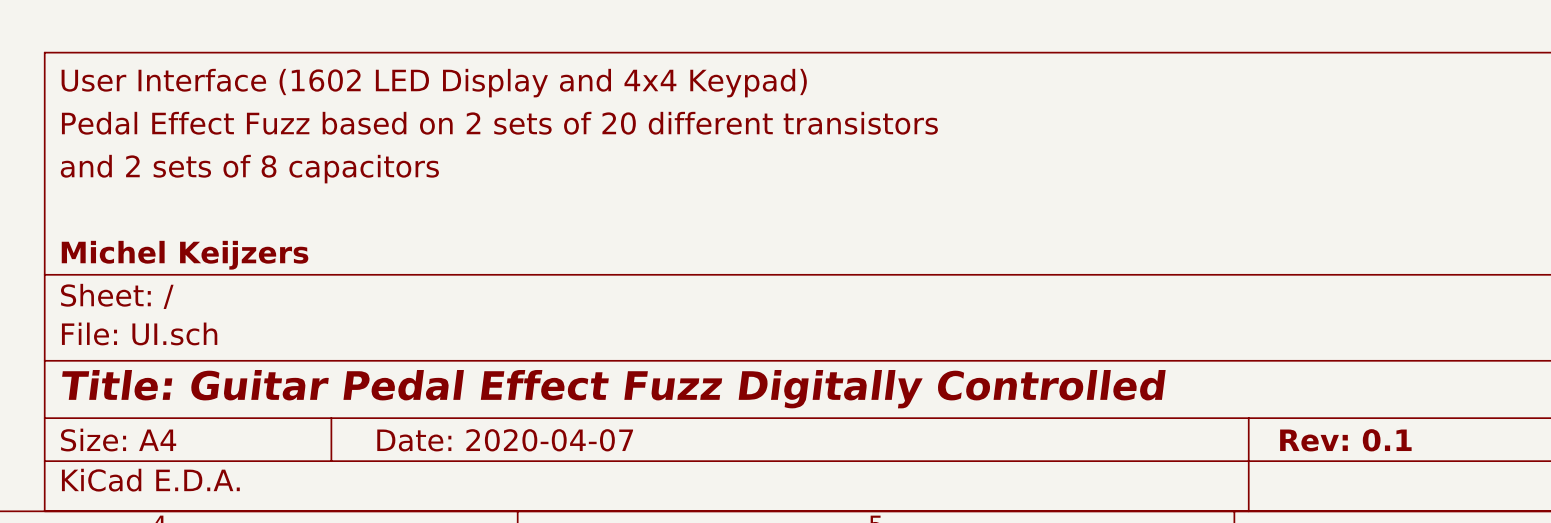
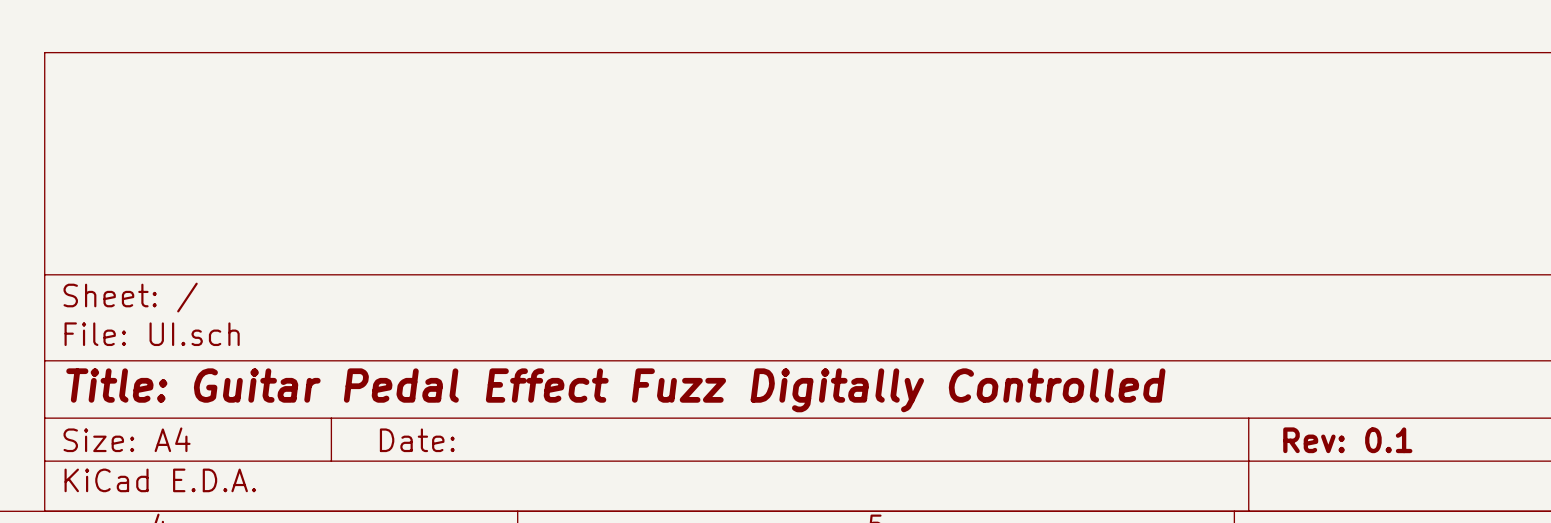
title block: User Interface (1602 LED Display and 4x4 Keypad) (434, 83) -> none
title block: Pedal Effect Fuzz based on 2 sets of 20 different transistors (499, 123) -> none
title block: and 2 sets of 8 capacitors (249, 169) -> none
title block: Michel Keijzers (185, 255) -> none
title block: Date: 2020-04-07 (505, 440) -> Date: (417, 440)

